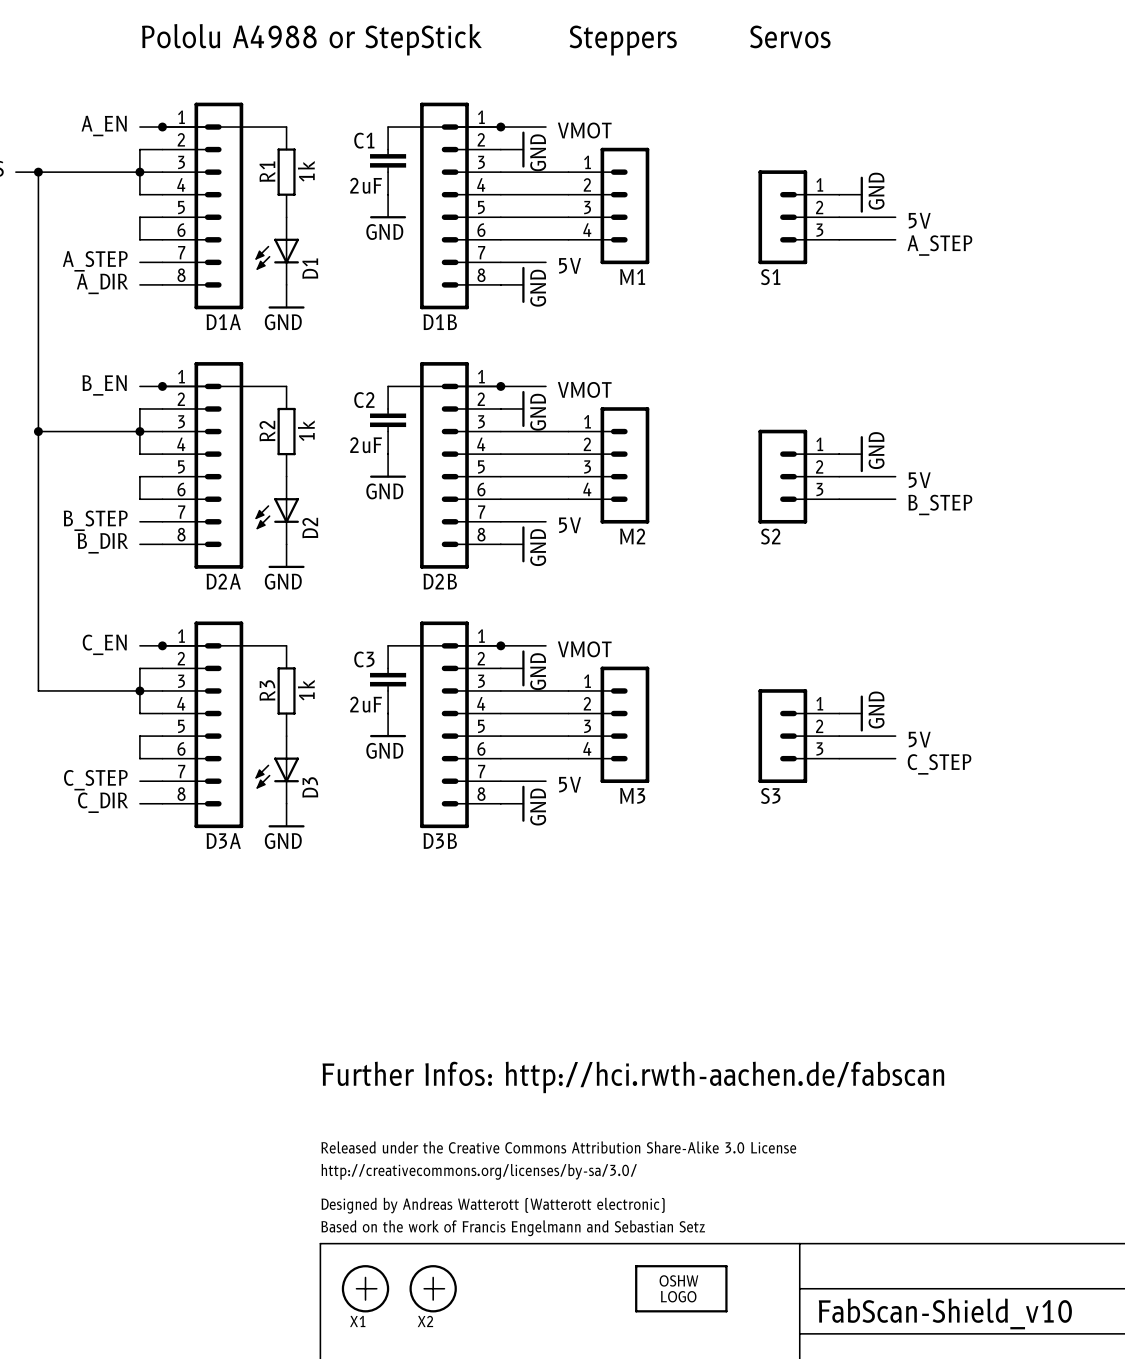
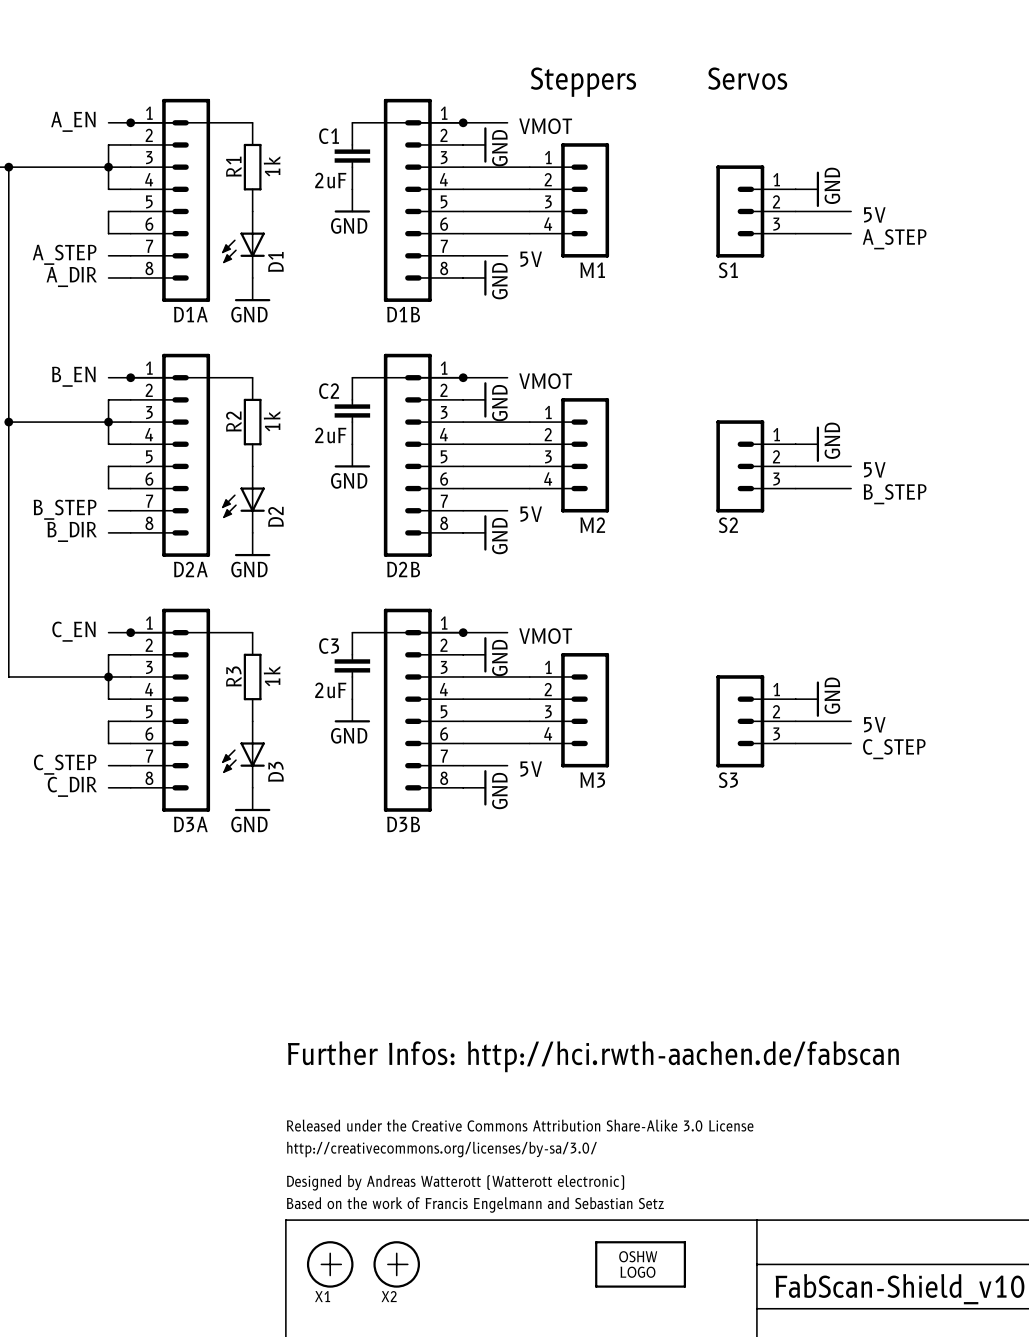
text position: Servos (790, 36) -> Servos (747, 78)
text: Pololu A4988 or StepStick (311, 39) -> none
text position: Steppers (623, 40) -> Steppers (583, 82)

